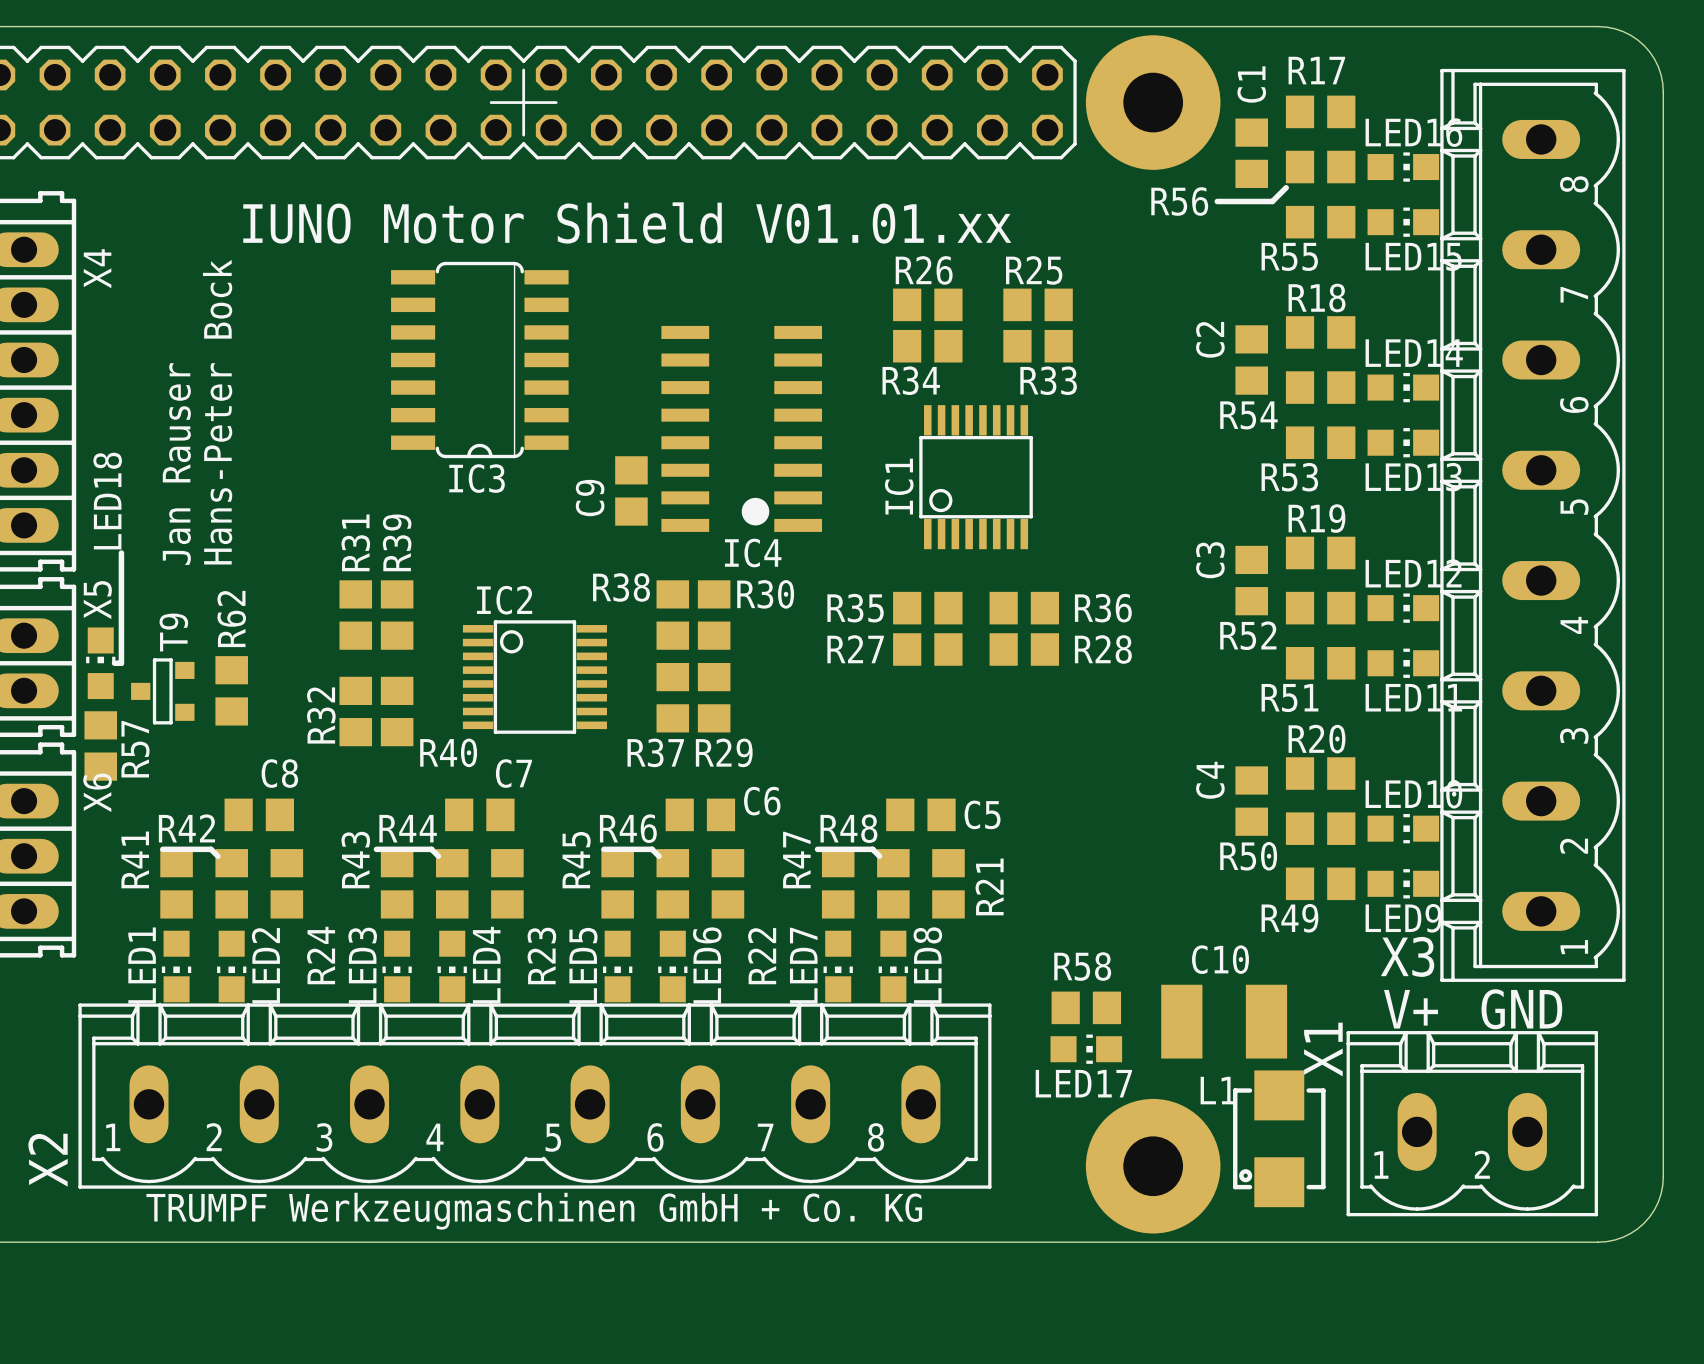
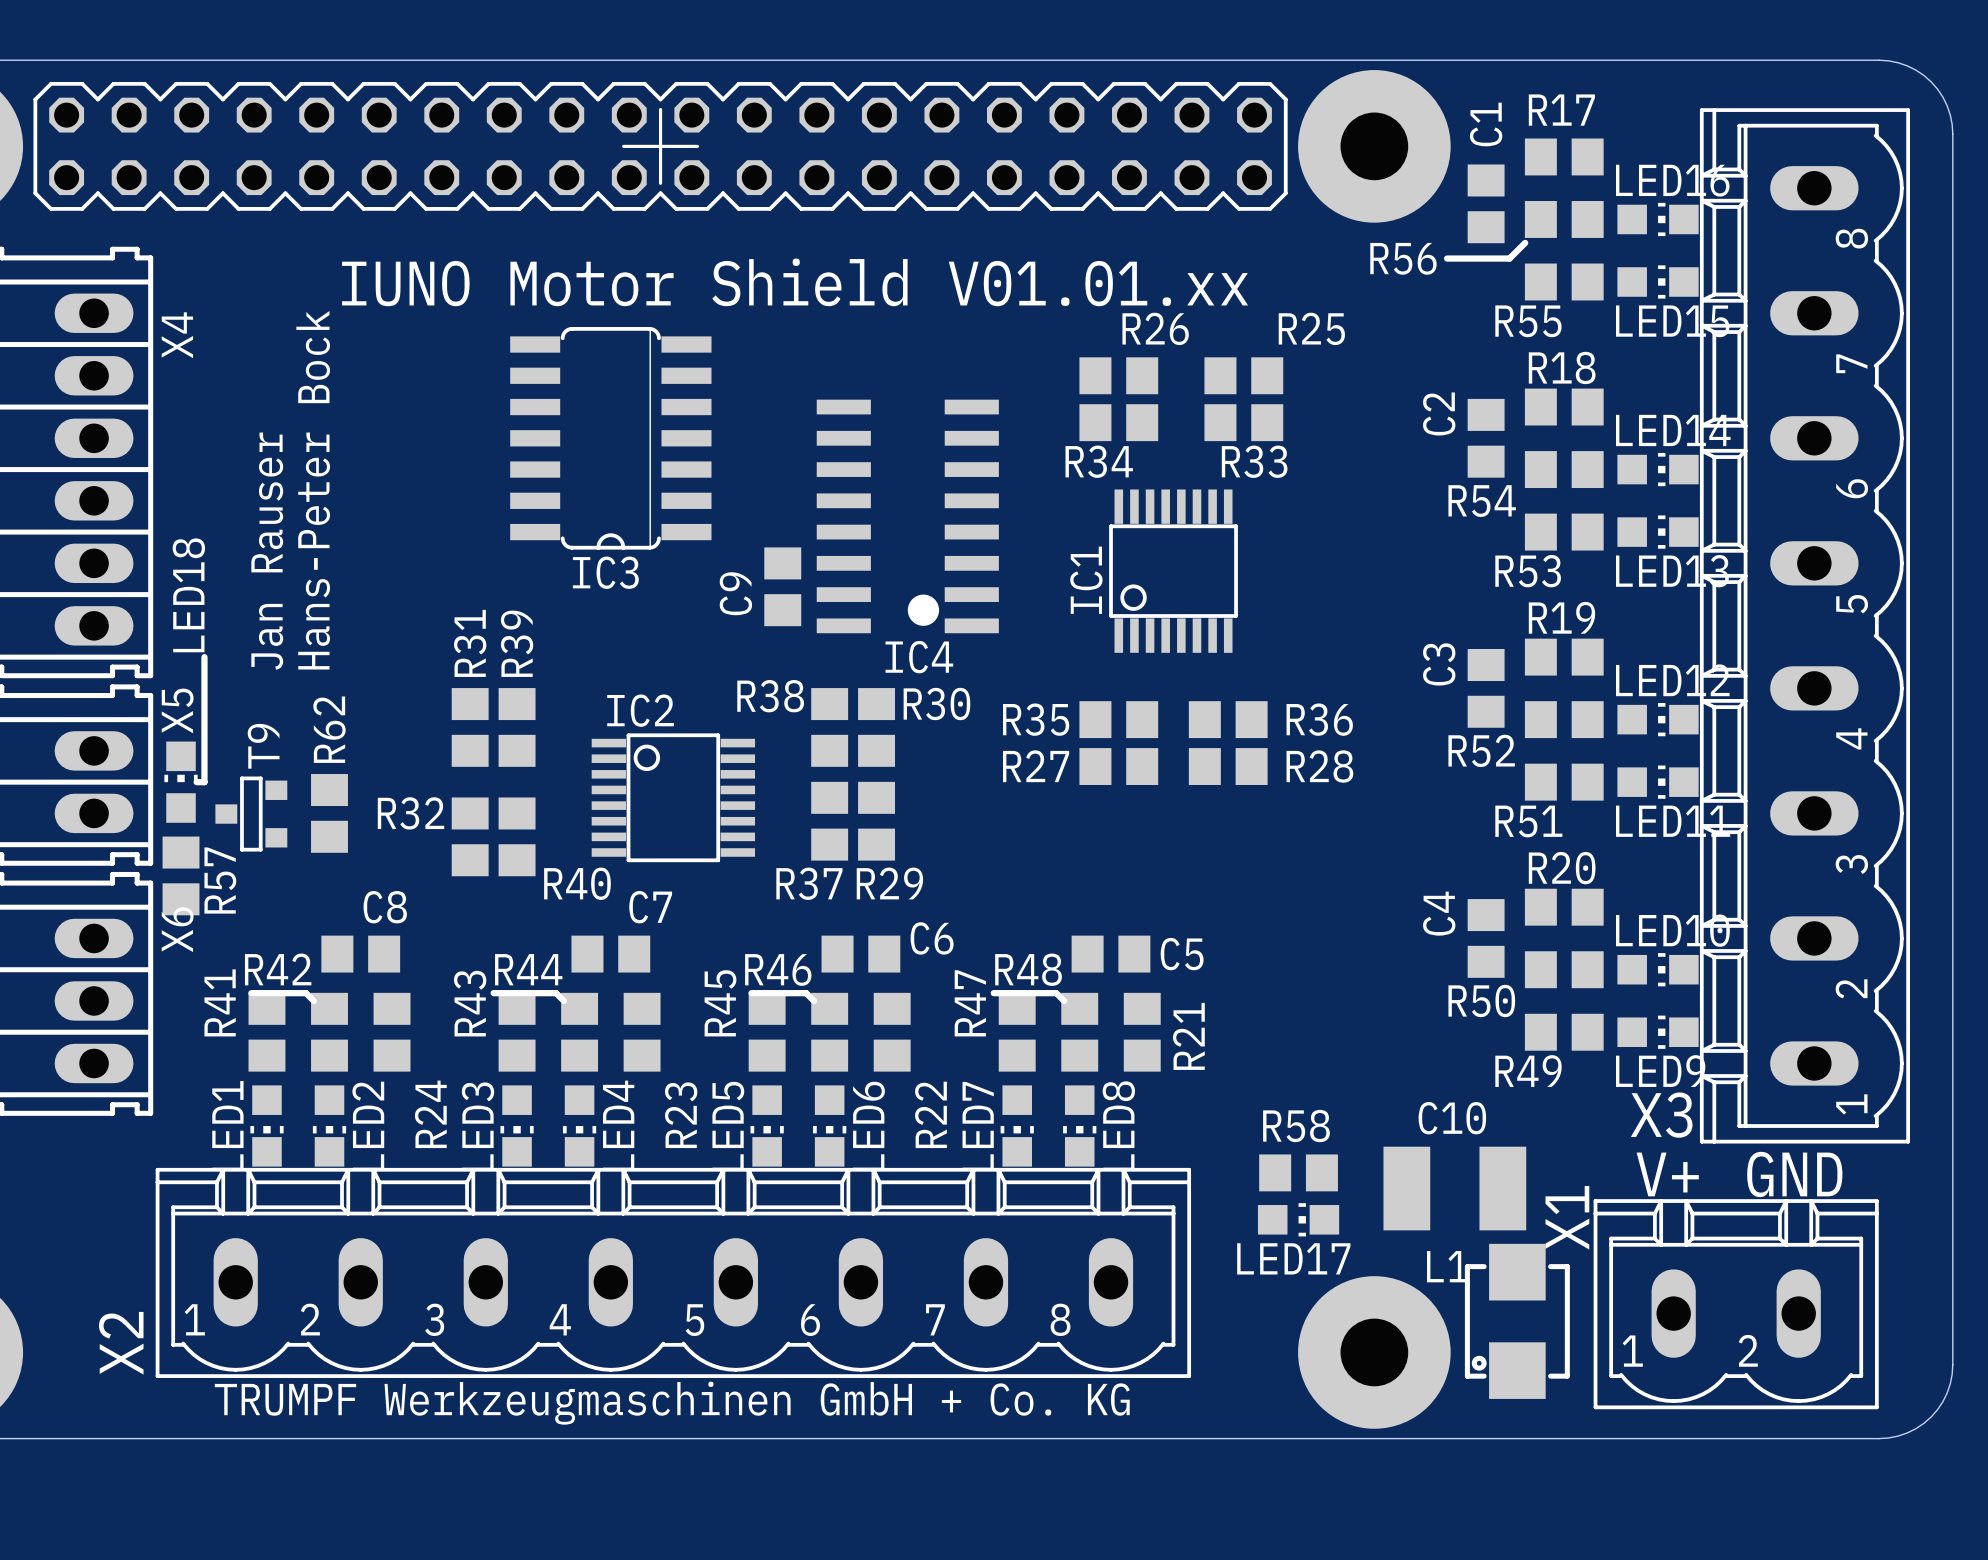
R26 name position: R26 (924, 270) -> R26 (1155, 328)
R25 name position: R25 (1034, 270) -> R25 (1311, 328)
R32 name rotation: 0° (321, 715) -> 90° clockwise (410, 813)

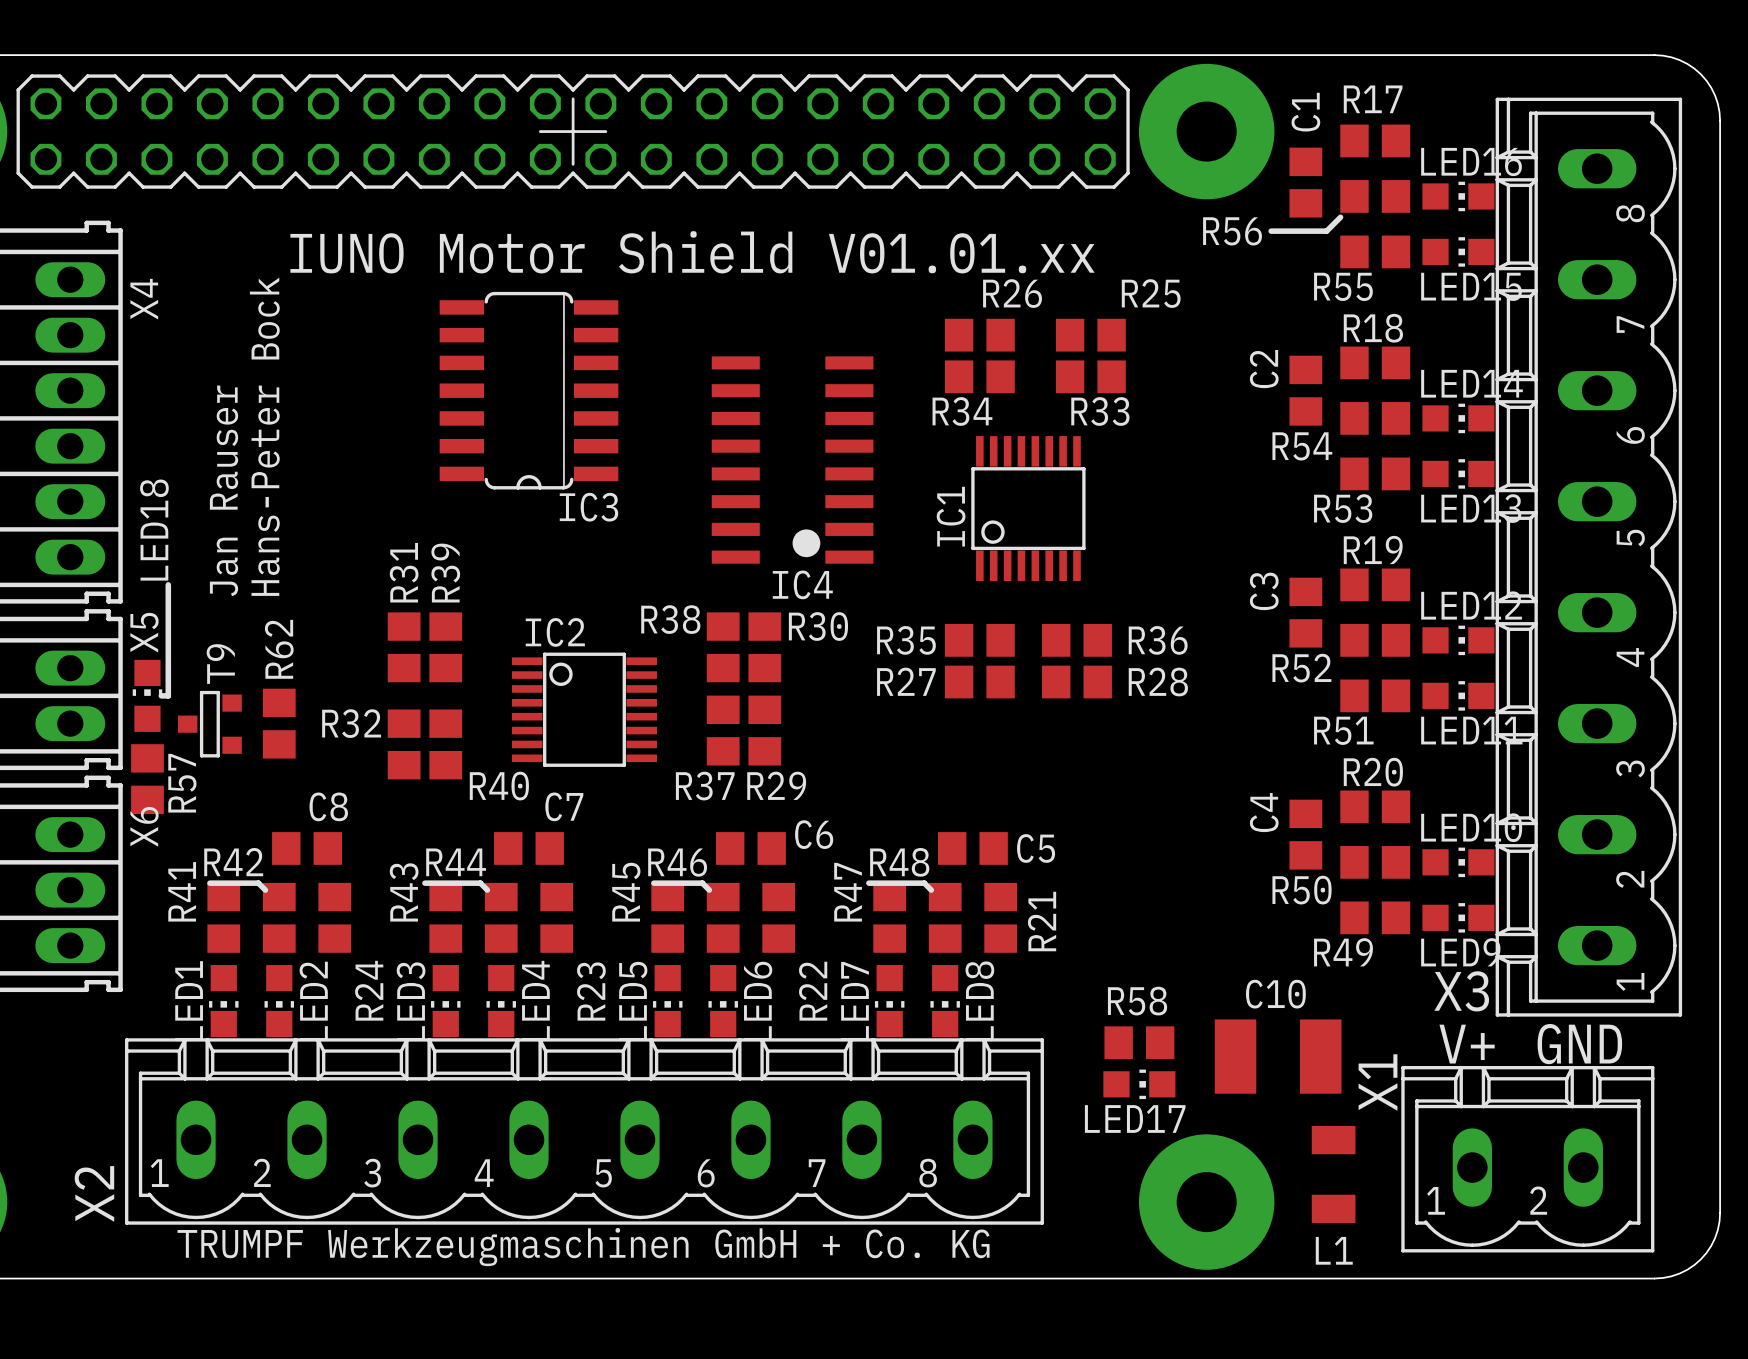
IC3 name position: IC3 (605, 572) -> IC3 (588, 507)
C9: (782, 586) -> none
L1 footprint: [1464, 1243, 1570, 1399] -> [1311, 1125, 1356, 1224]
L1 name position: L1 (1447, 1266) -> L1 (1334, 1250)

